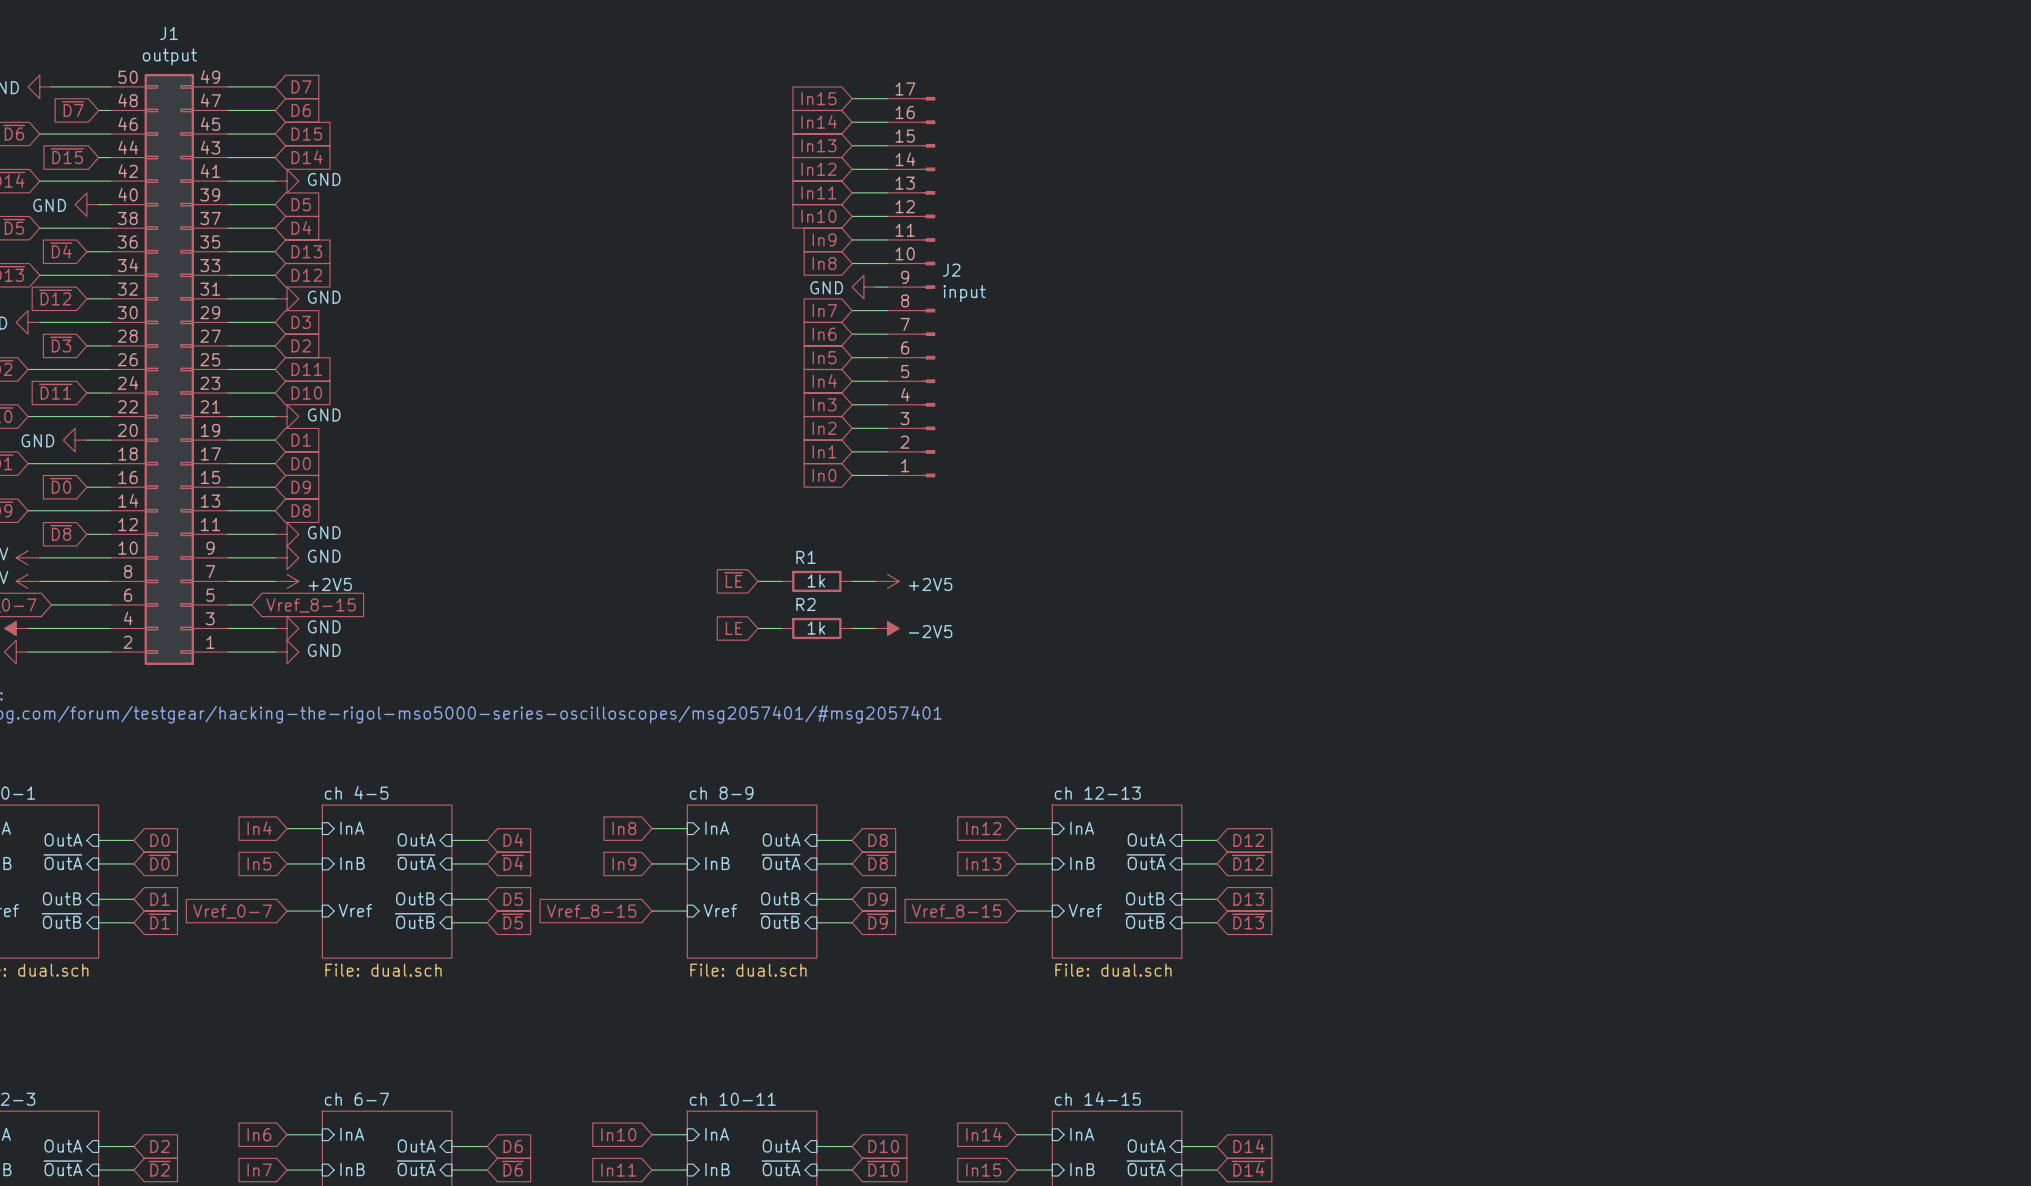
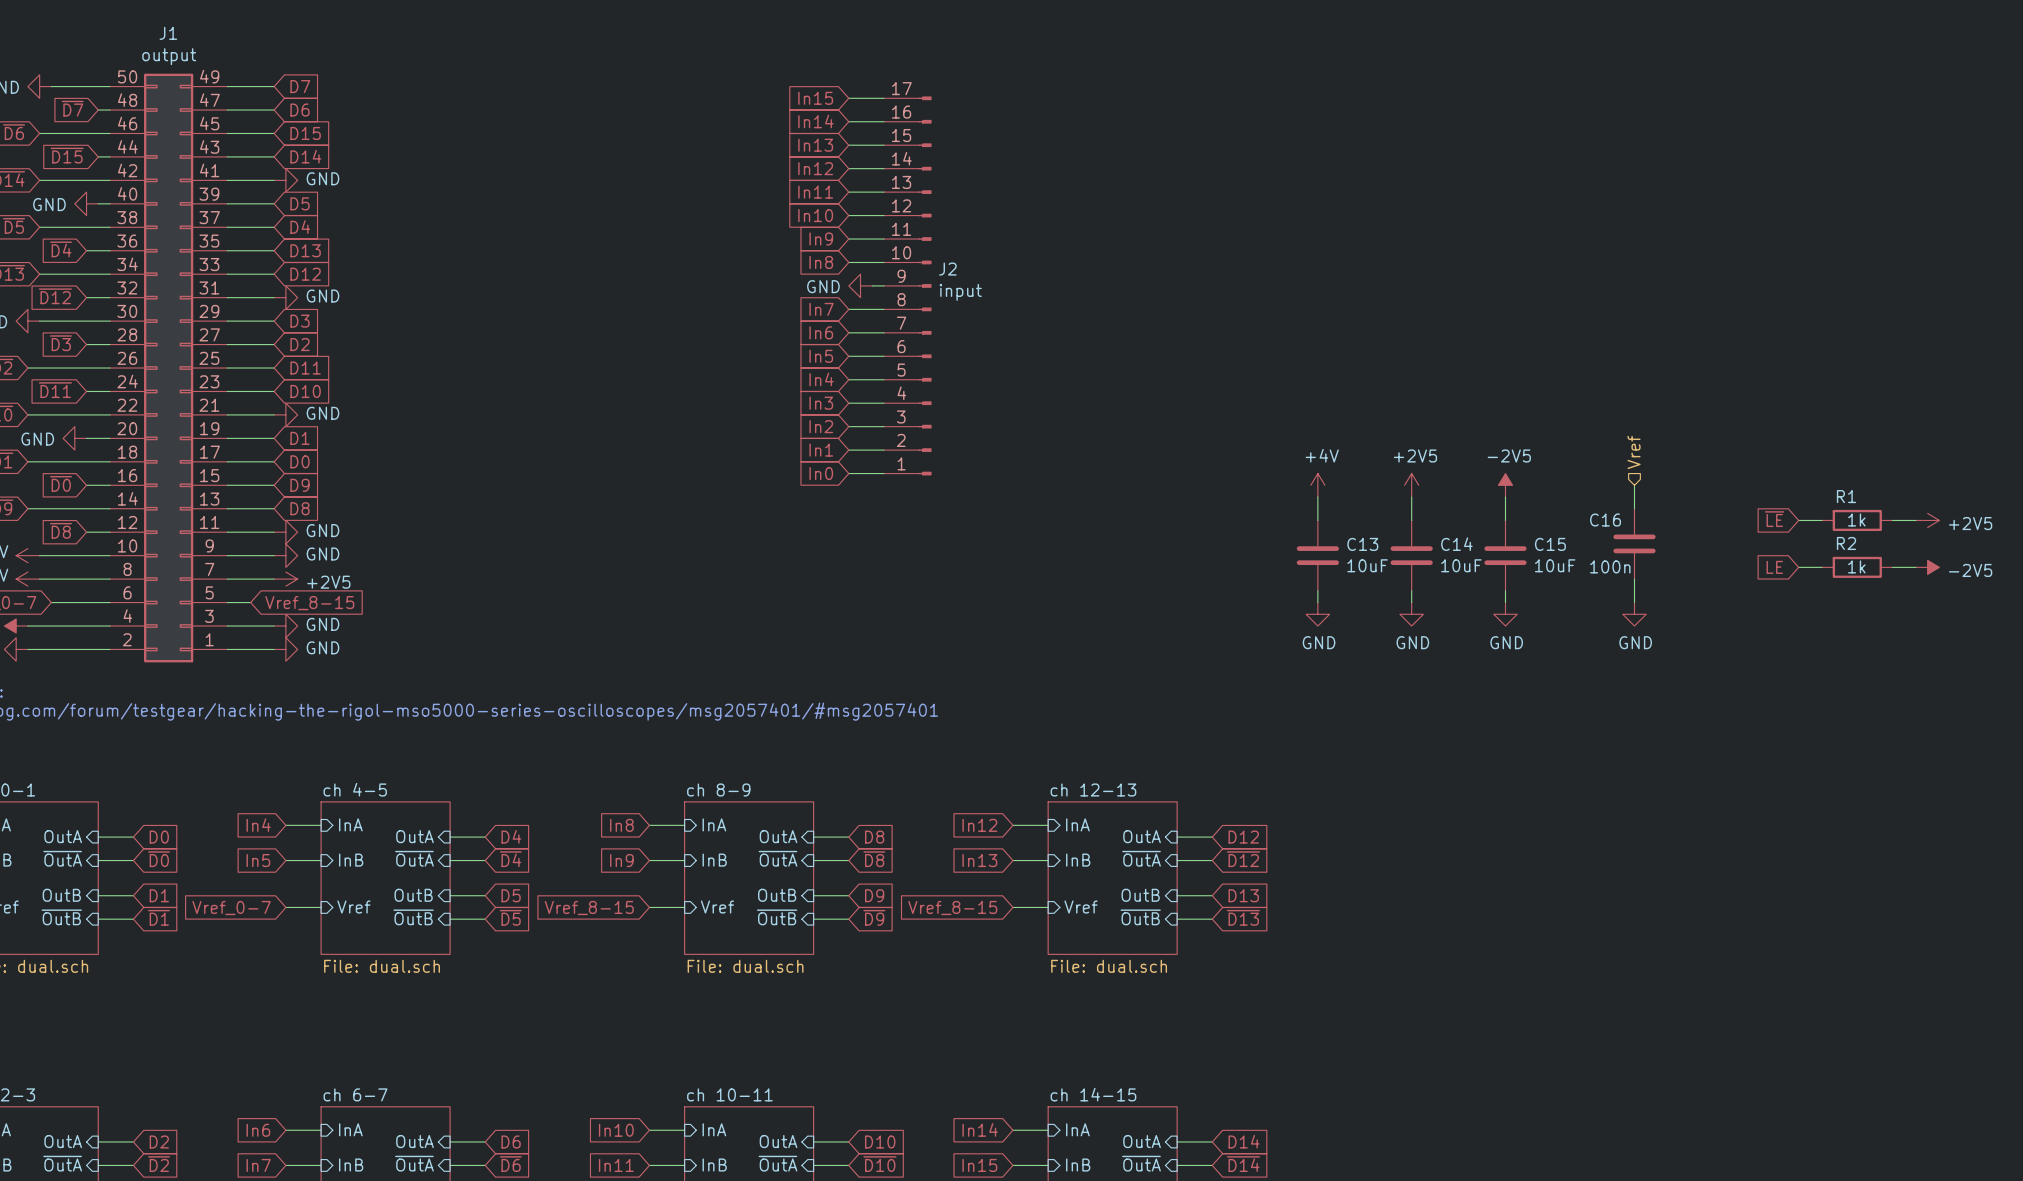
hierarchical label: none -> Vref (1634, 452)
power symbol: none -> +4V (1317, 485)
power symbol: none -> +2V5 (1411, 485)
power symbol: none -> -2V5 (1505, 485)
wire: none -> (1634, 485) (1634, 508)
wire: none -> (1317, 497) (1317, 520)
wire: none -> (1411, 497) (1411, 520)
wire: none -> (1505, 497) (1505, 520)
global label: none -> ~{LE} (1774, 519)
wire: none -> (1798, 520) (1822, 520)
wire: none -> (1892, 520) (1915, 520)
power symbol: none -> +2V5 (1927, 520)
C16: none -> 100n (1634, 543)
C13: none -> 10uF (1317, 555)
C14: none -> 10uF (1411, 555)
C15: none -> 10uF (1505, 555)
global label: none -> LE (1774, 567)
wire: none -> (1798, 567) (1822, 567)
wire: none -> (1892, 567) (1915, 567)
power symbol: none -> -2V5 (1927, 567)
global label: ~{LE} (733, 580) -> none
wire: (757, 581) (781, 581) -> none
R1 position: (816, 581) -> (1857, 520)
wire: (852, 581) (875, 581) -> none
power symbol: +2V5 (887, 581) -> none
wire: none -> (1634, 579) (1634, 602)
wire: none -> (1317, 590) (1317, 602)
wire: none -> (1411, 590) (1411, 602)
wire: none -> (1505, 590) (1505, 602)
power symbol: none -> GND (1317, 614)
power symbol: none -> GND (1411, 614)
power symbol: none -> GND (1505, 614)
power symbol: none -> GND (1634, 614)
global label: LE (733, 628) -> none
wire: (757, 628) (781, 628) -> none
R2 position: (816, 628) -> (1857, 567)
wire: (852, 628) (875, 628) -> none
power symbol: -2V5 (887, 628) -> none

